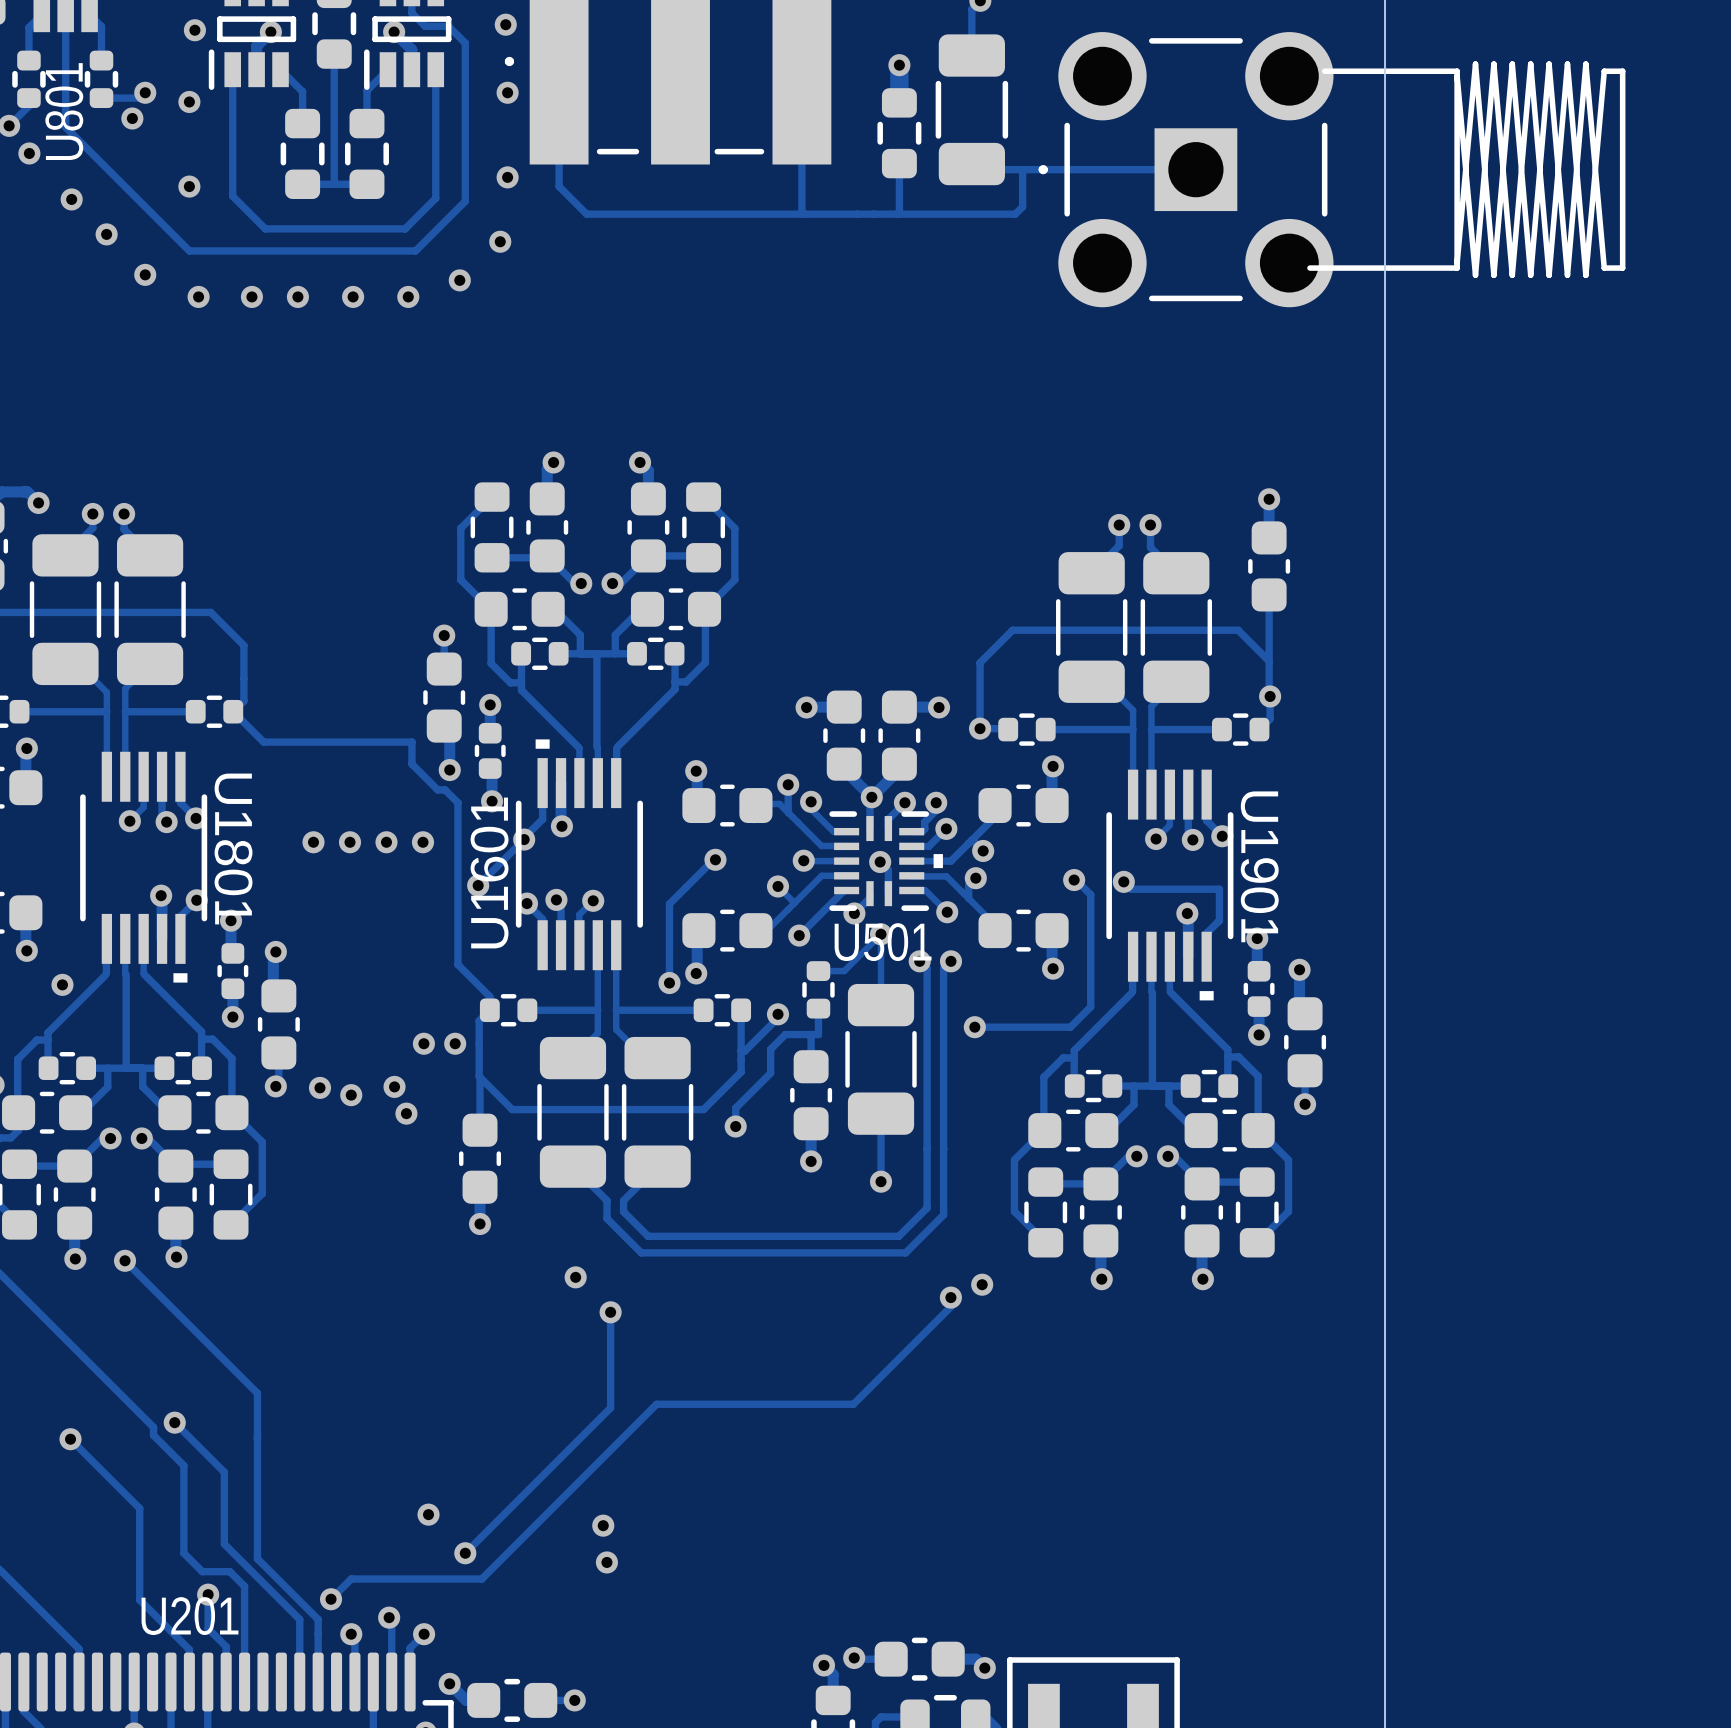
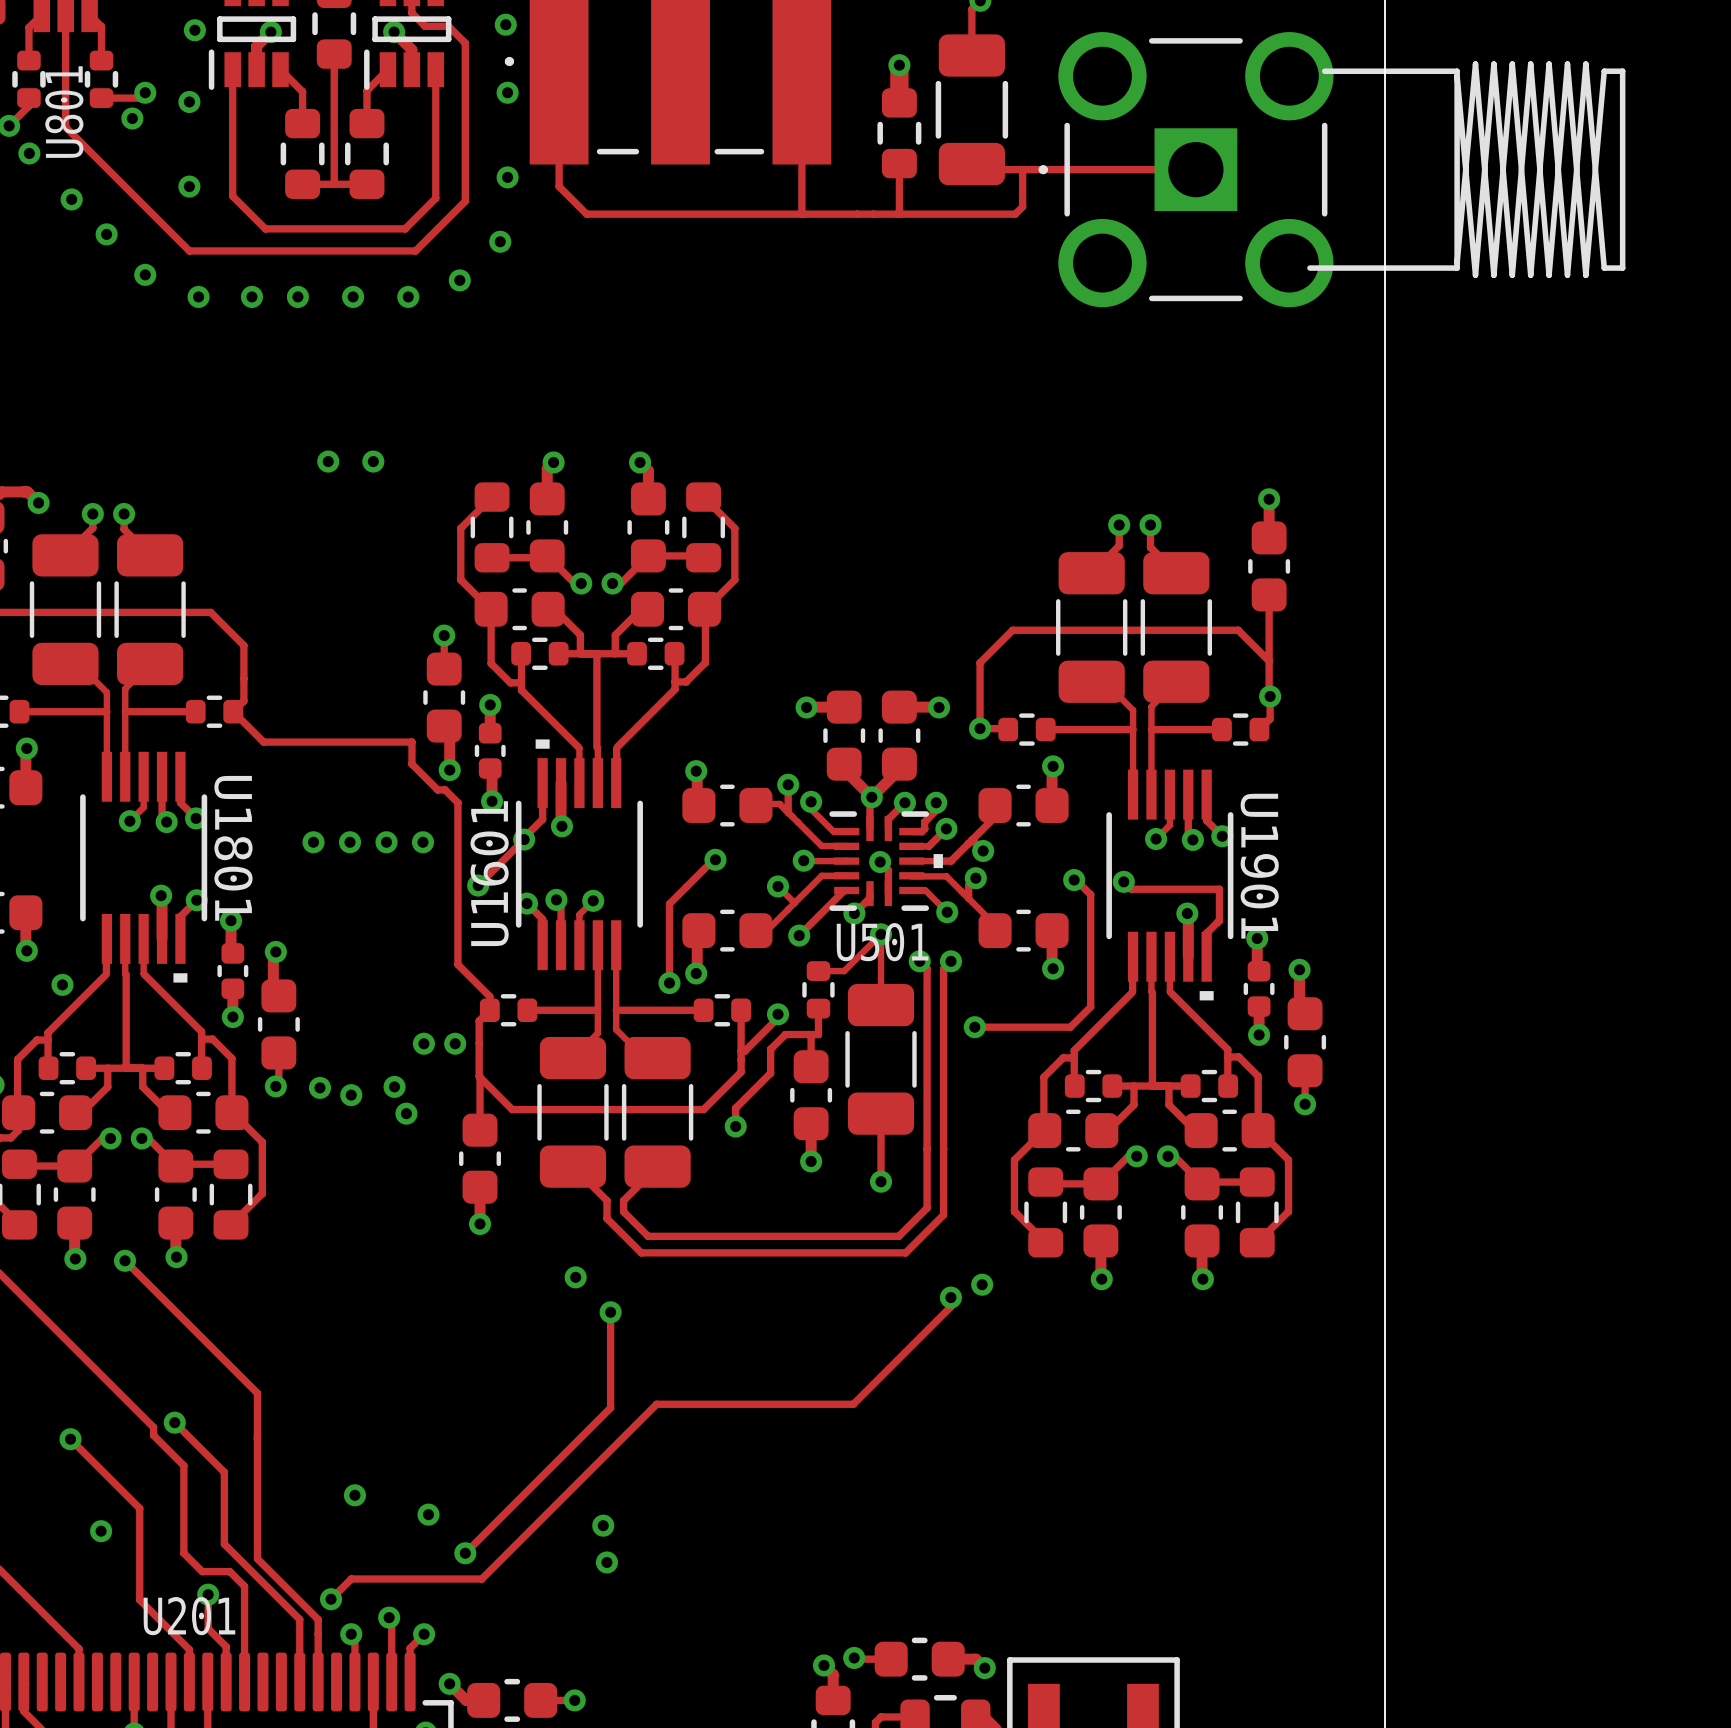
via: none -> (328, 461)
via: none -> (373, 461)
via: none -> (354, 1495)
via: none -> (101, 1531)

